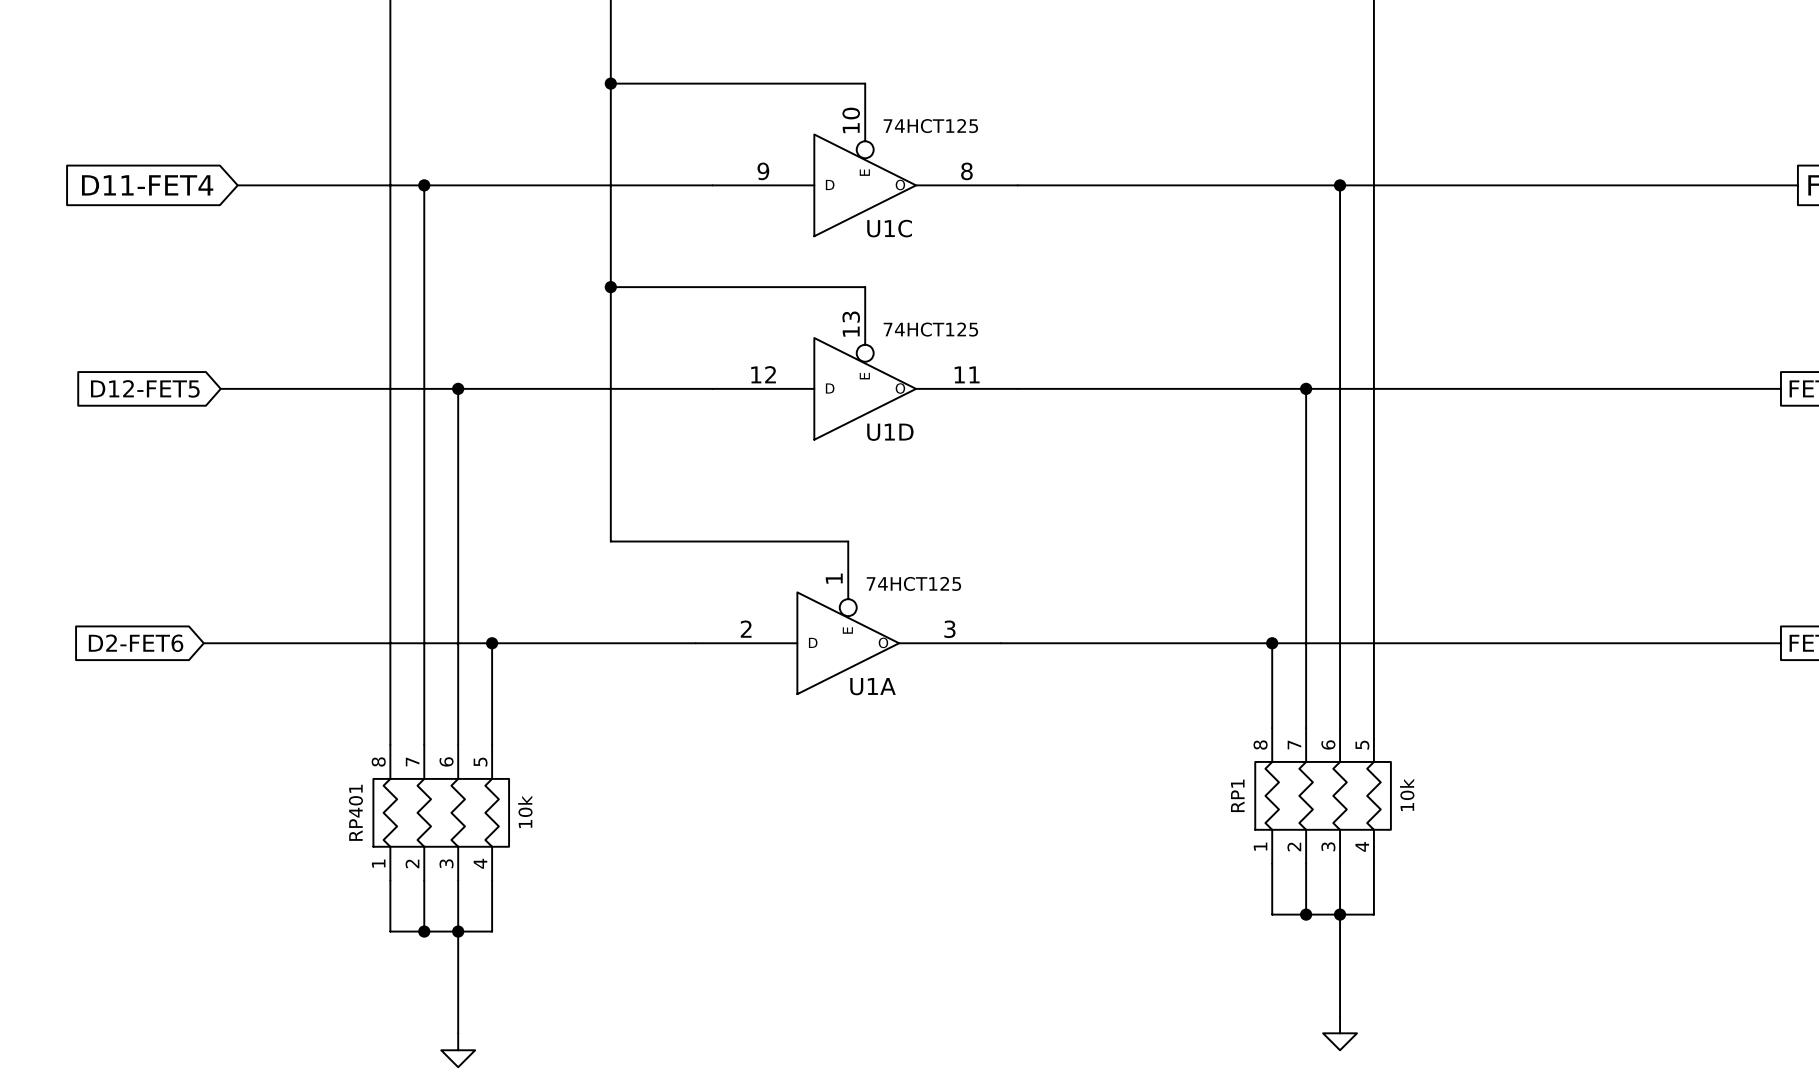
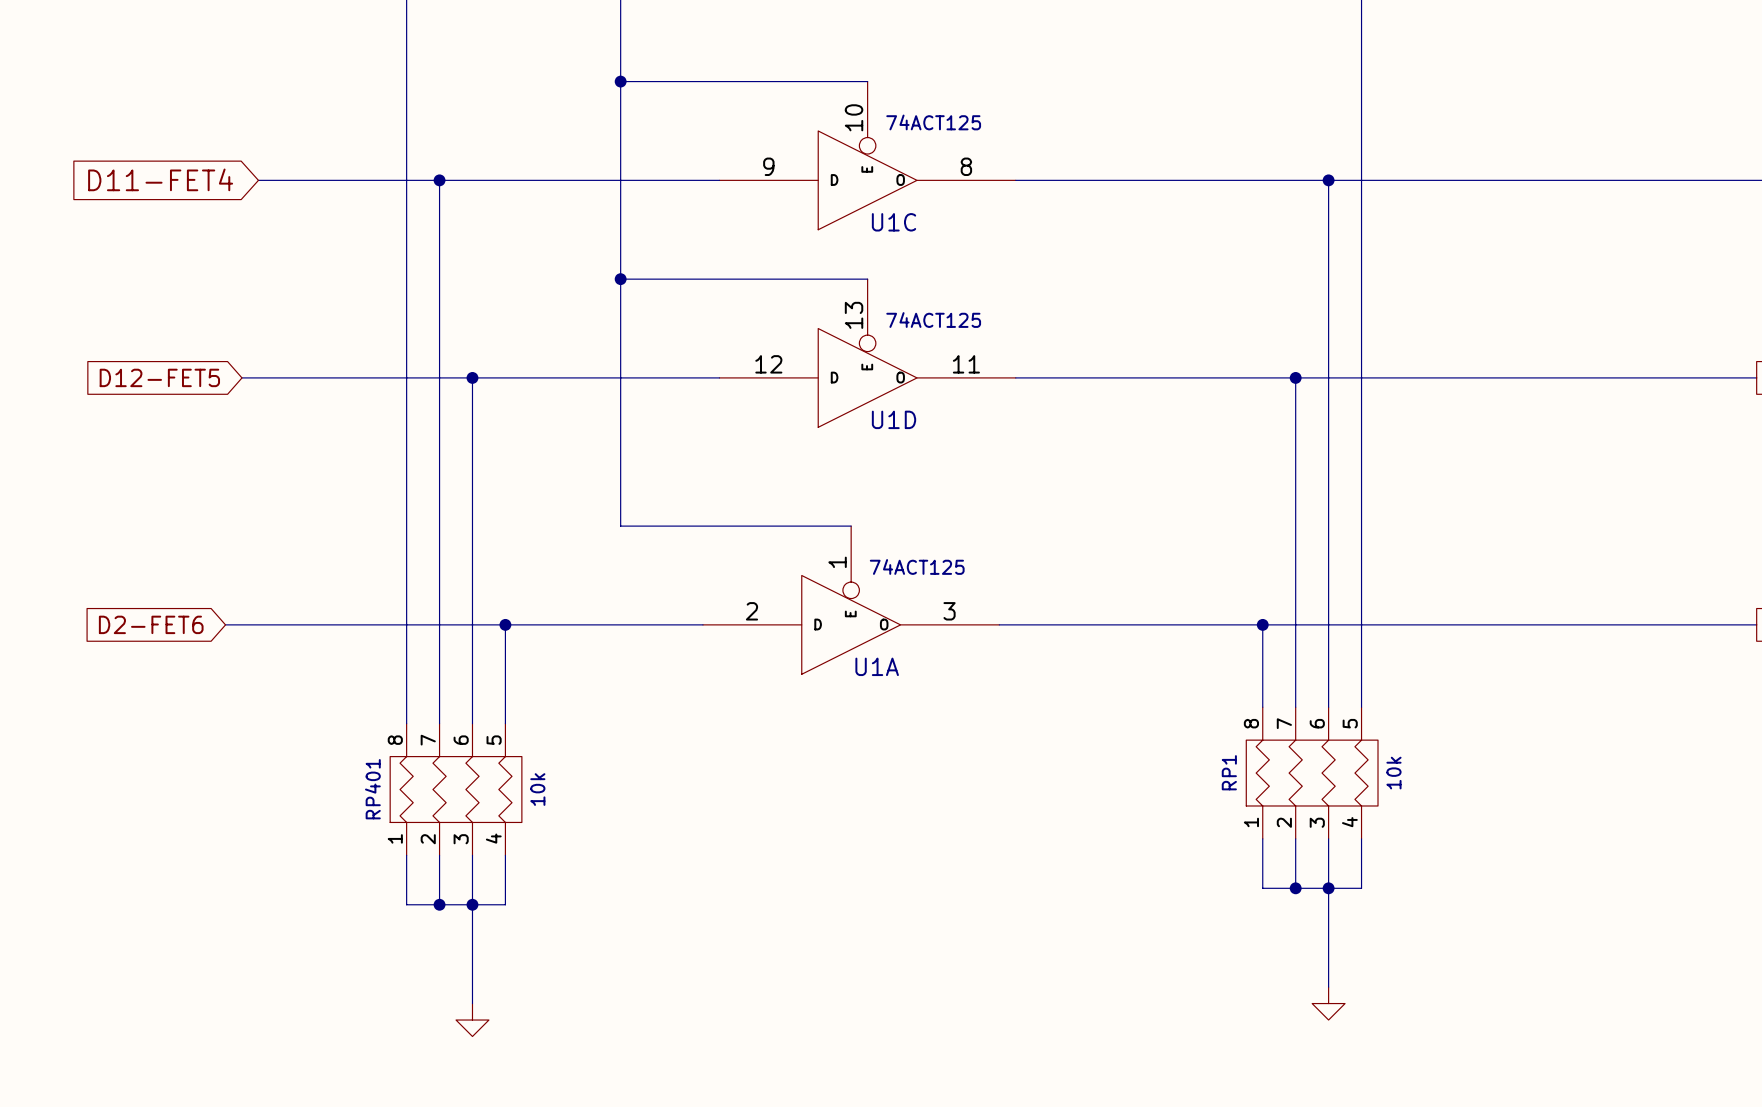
U1C value: 74HCT125 (930, 126) -> 74ACT125 (933, 122)
U1D value: 74HCT125 (930, 329) -> 74ACT125 (933, 320)
U1A value: 74HCT125 (913, 583) -> 74ACT125 (917, 566)

